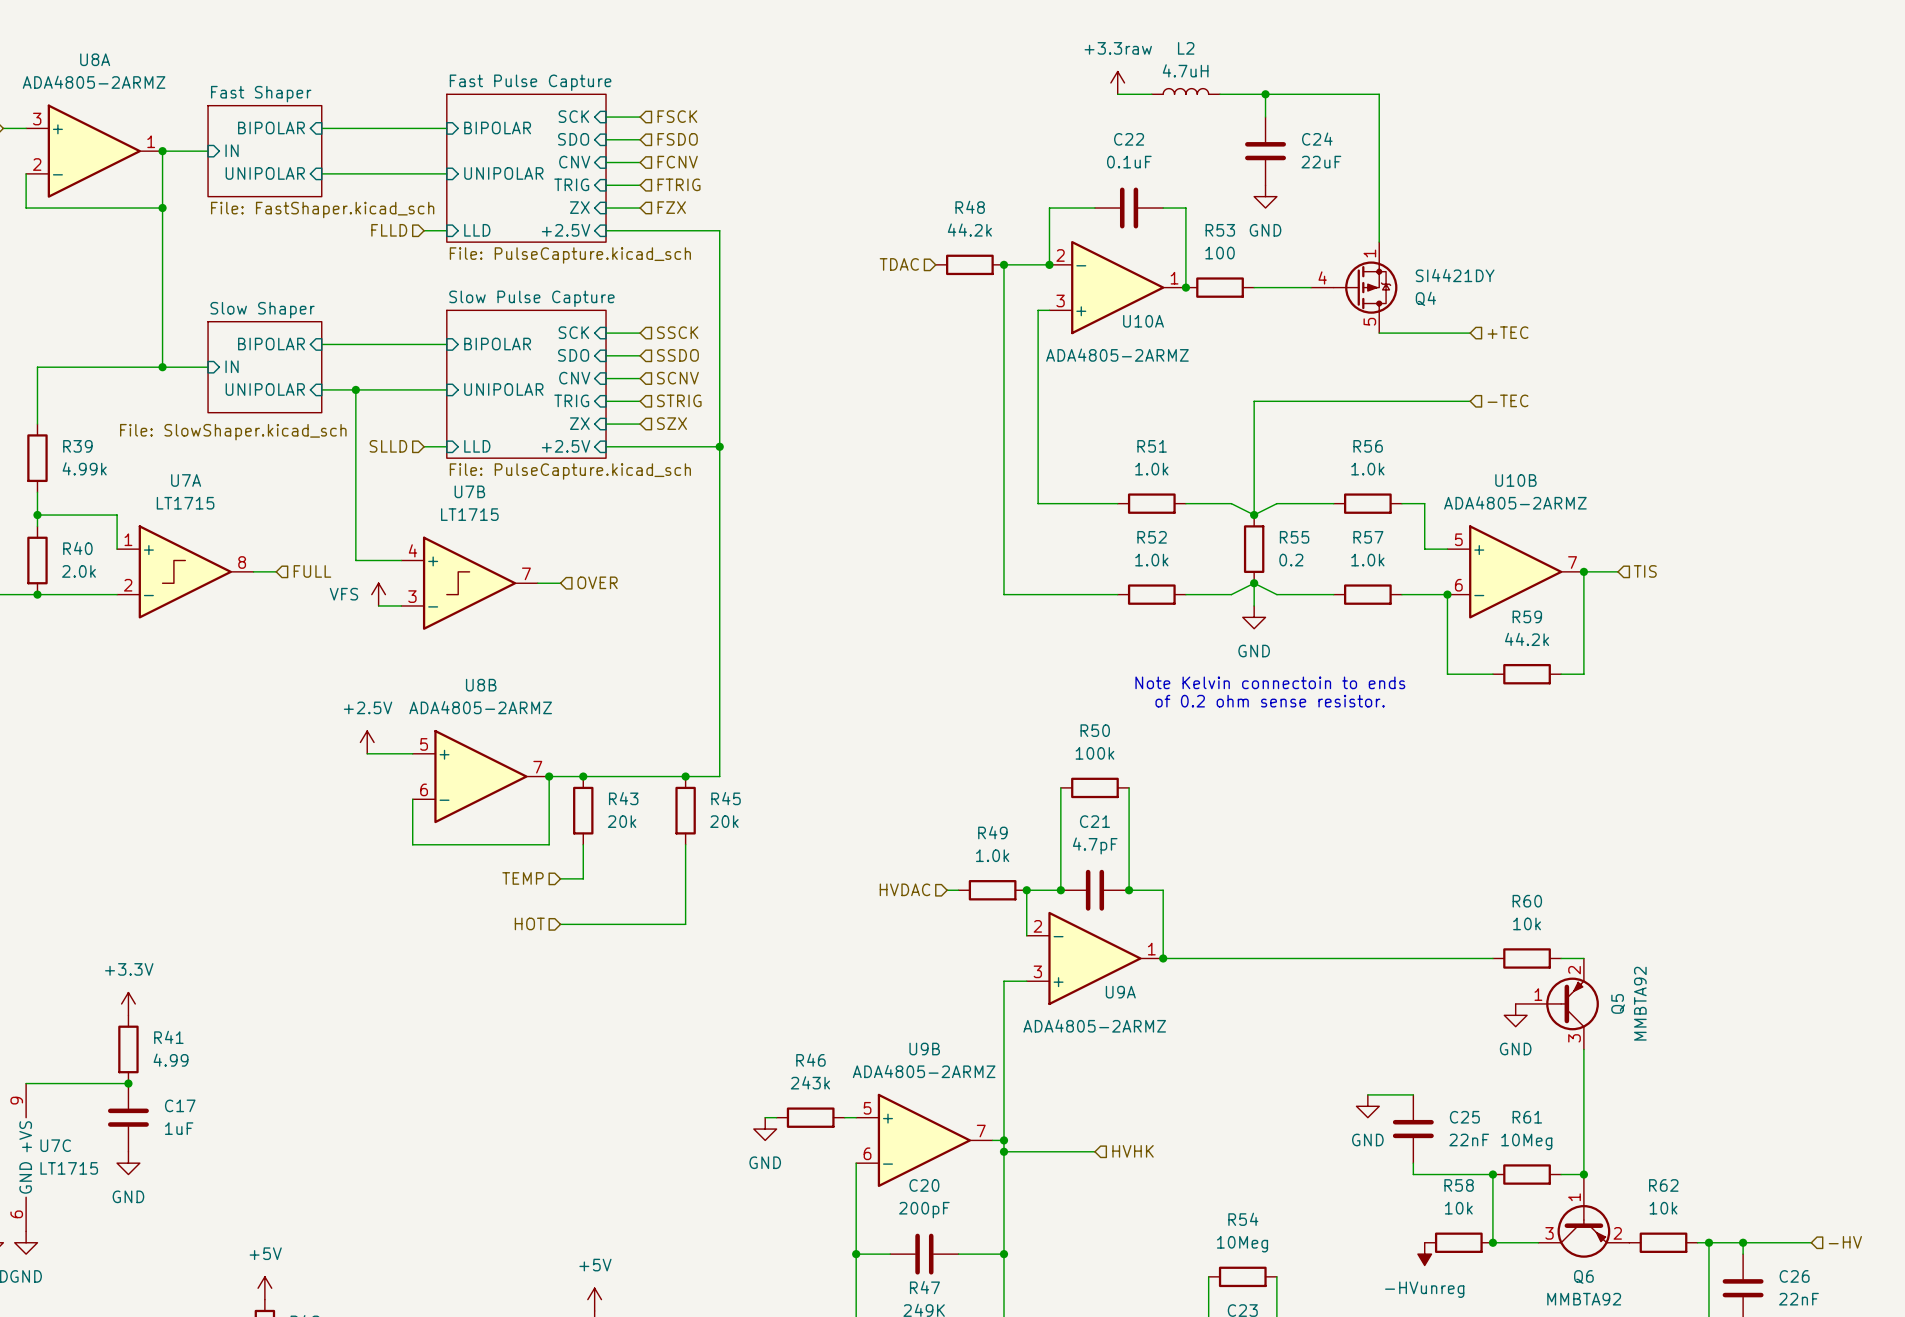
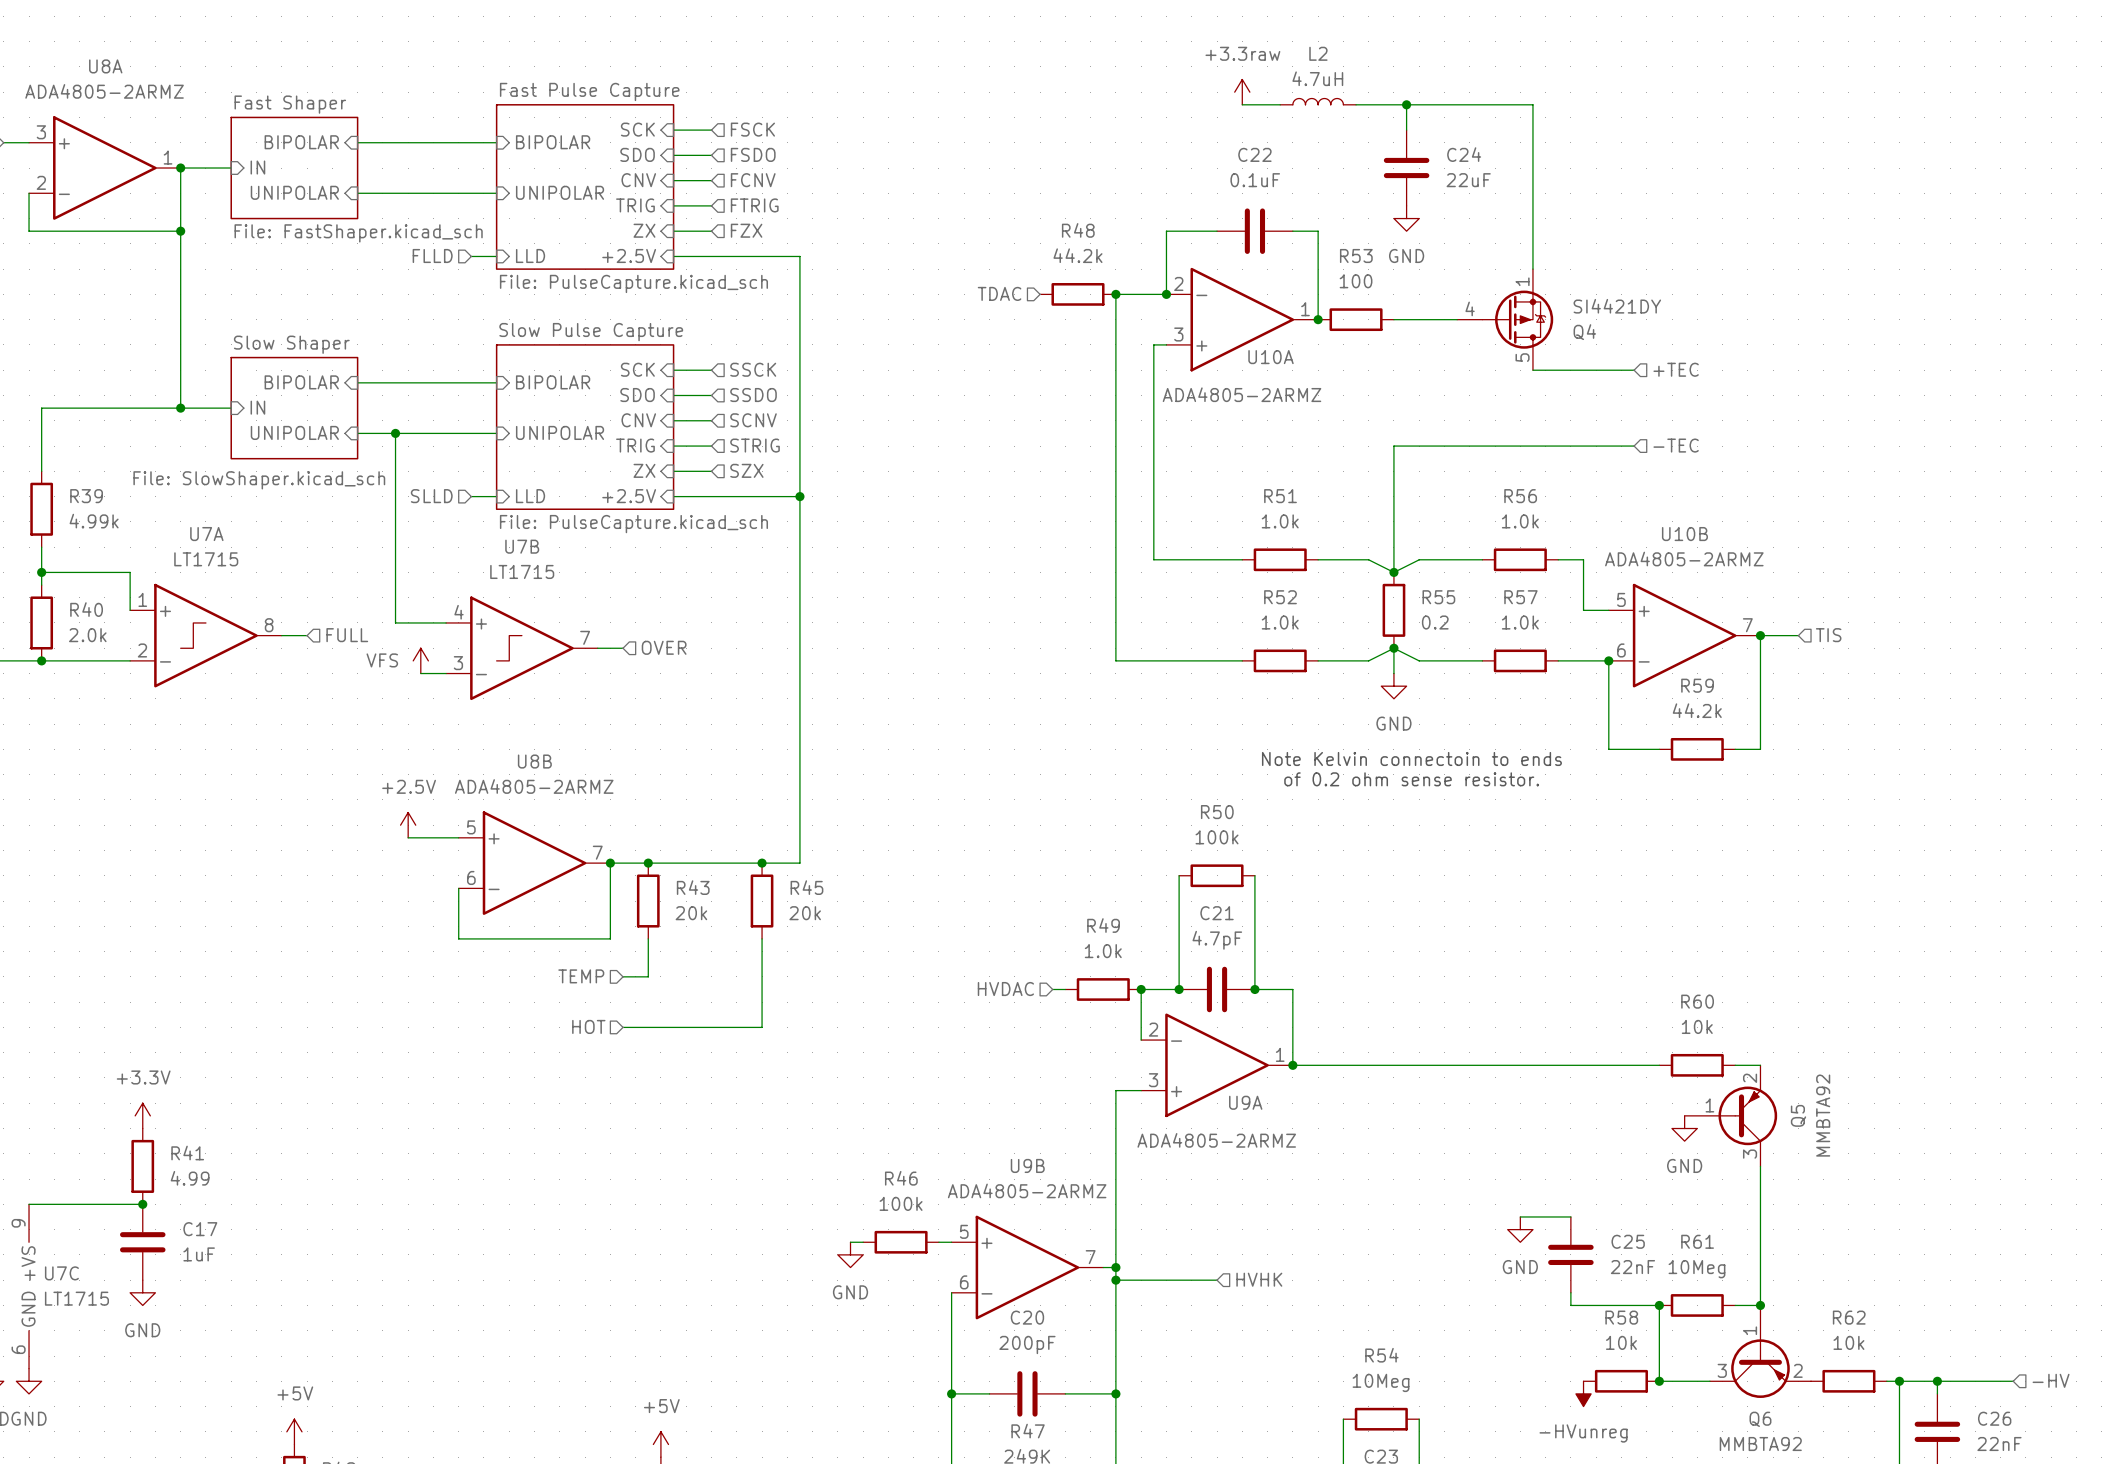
R46 value: 243k (810, 1082) -> 100k (901, 1203)

